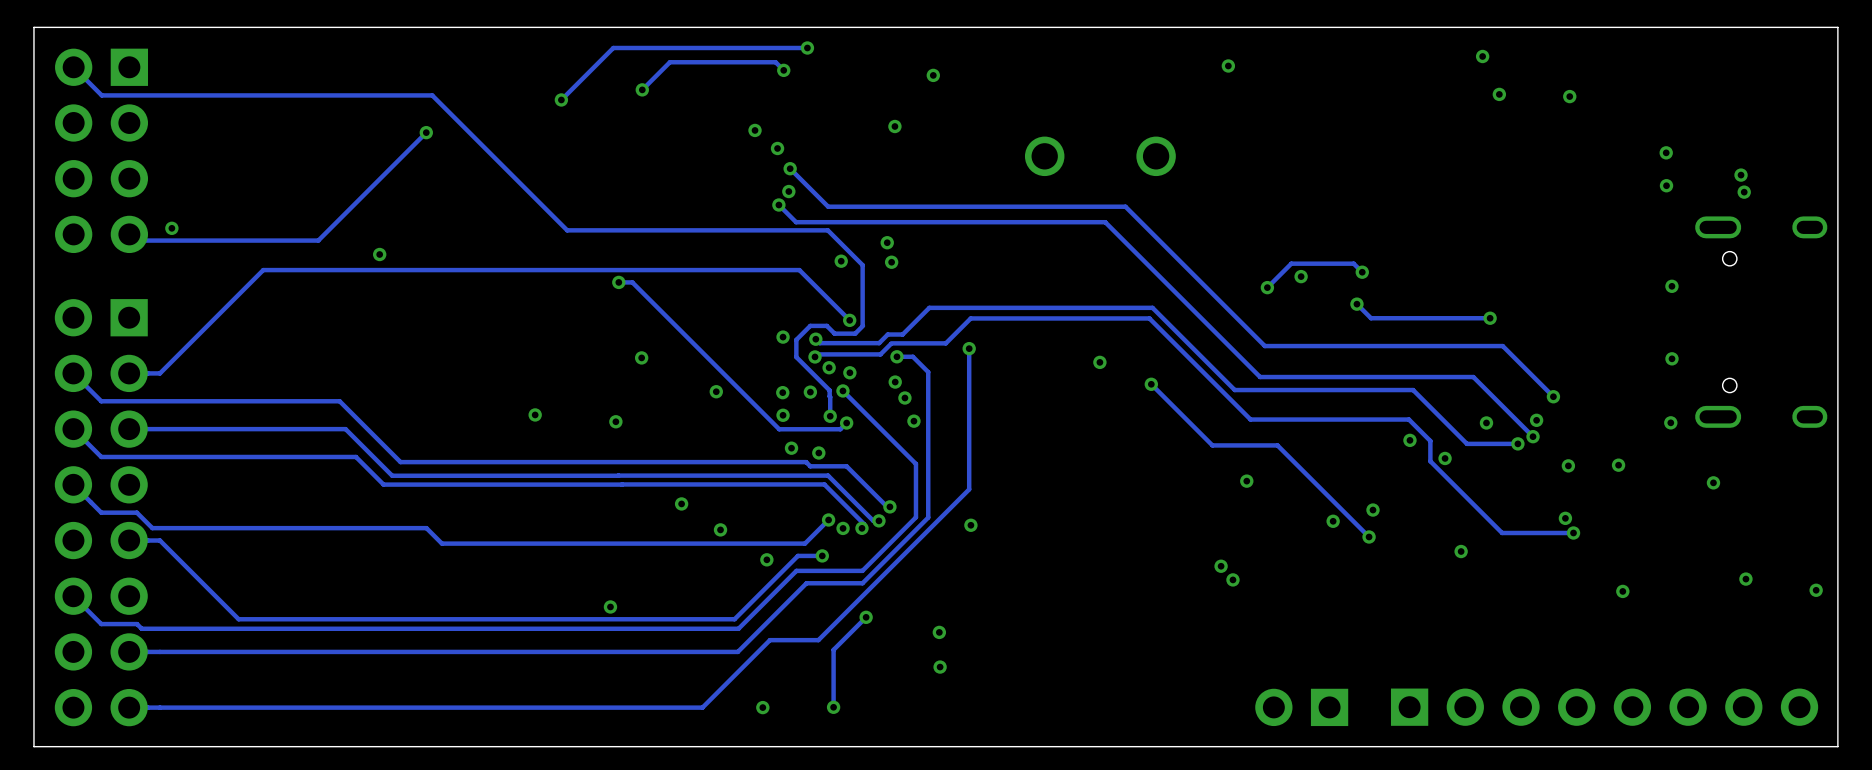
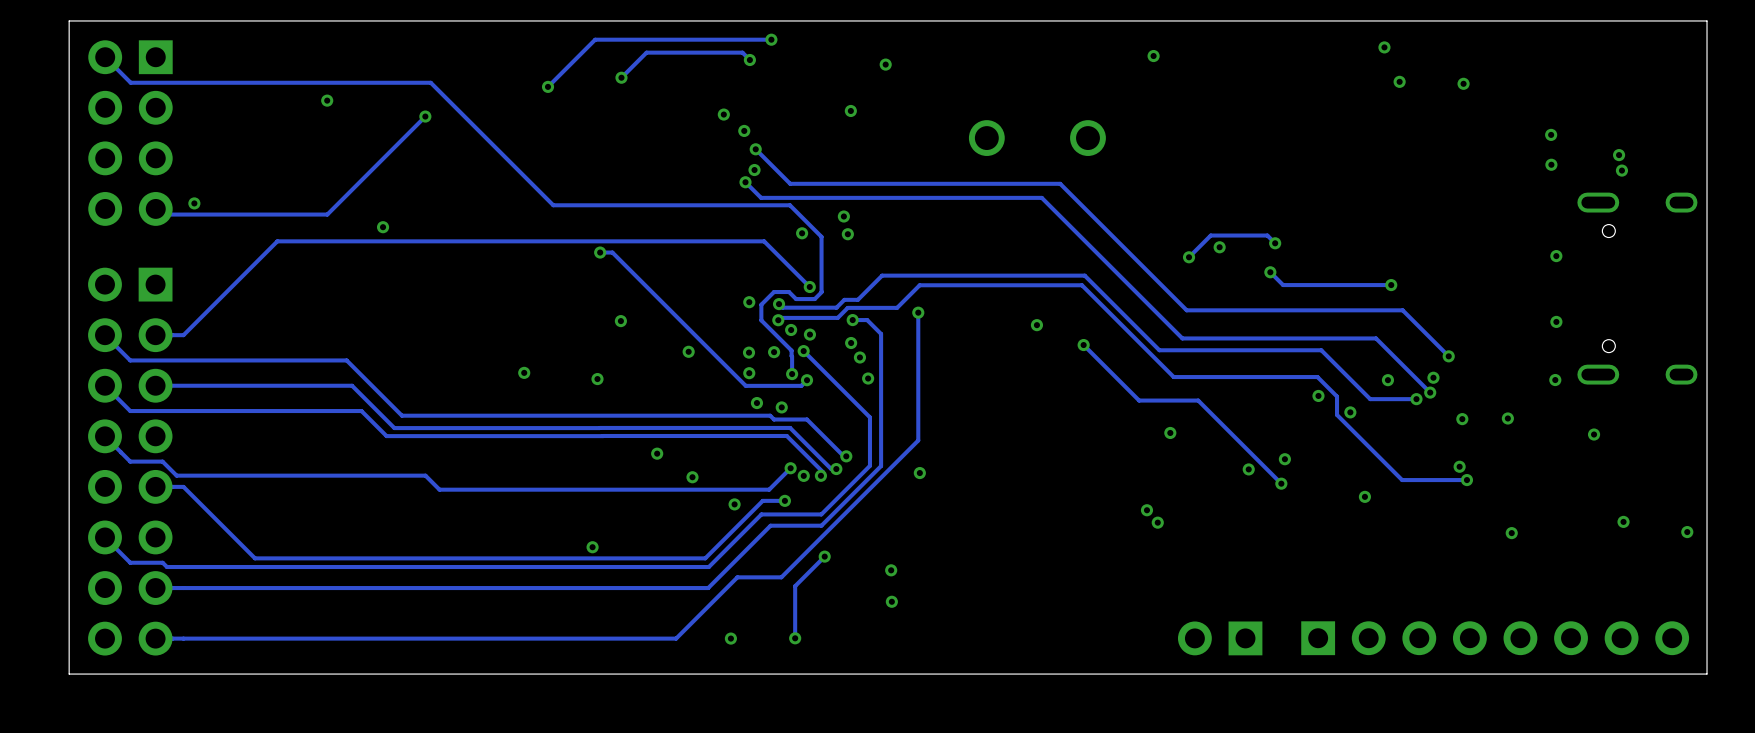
via: none -> (327, 100)

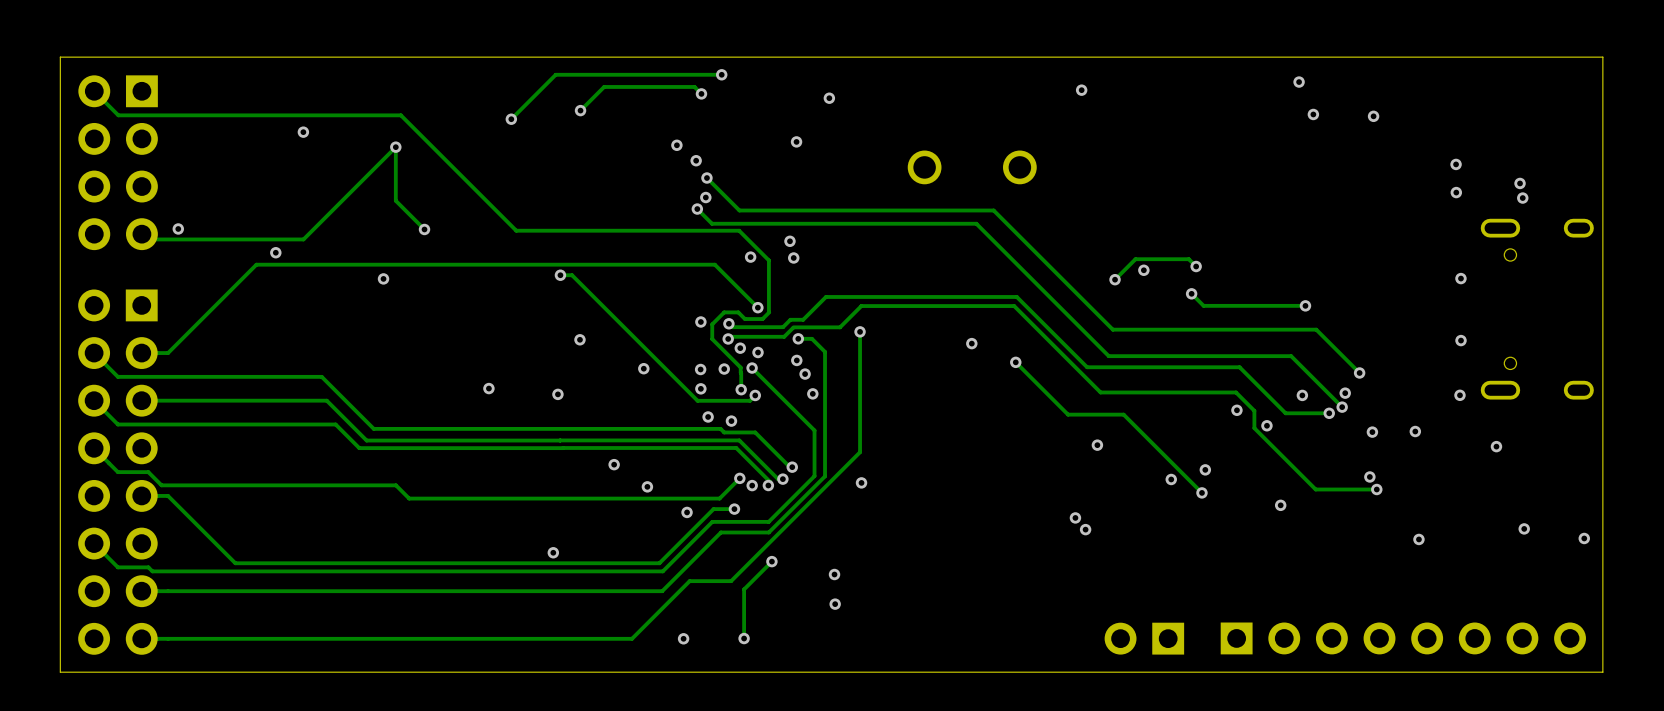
track: none -> (395, 147) (395, 200) (424, 229)
via: none -> (424, 229)
via position: (383, 227) -> (383, 278)
via: none -> (275, 252)

